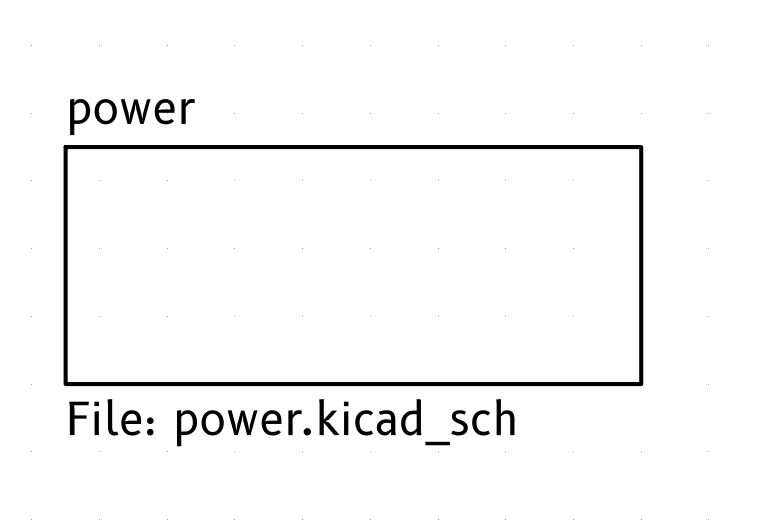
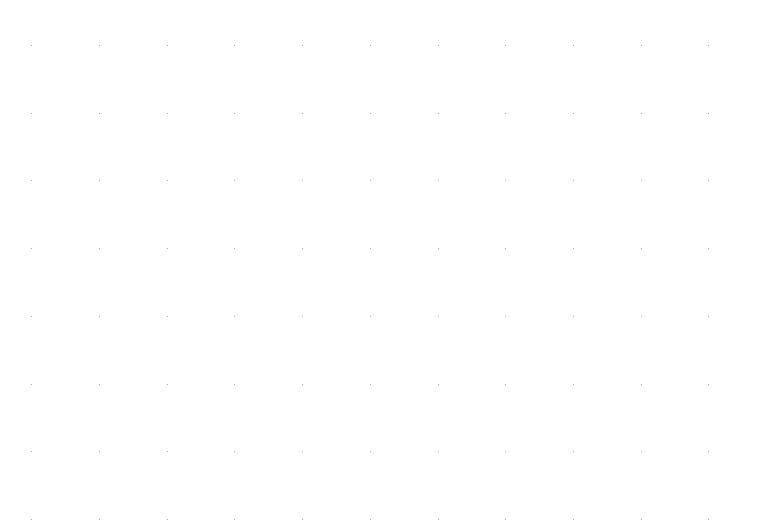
sheet power: File: power.kicad_sch (353, 265) -> none

